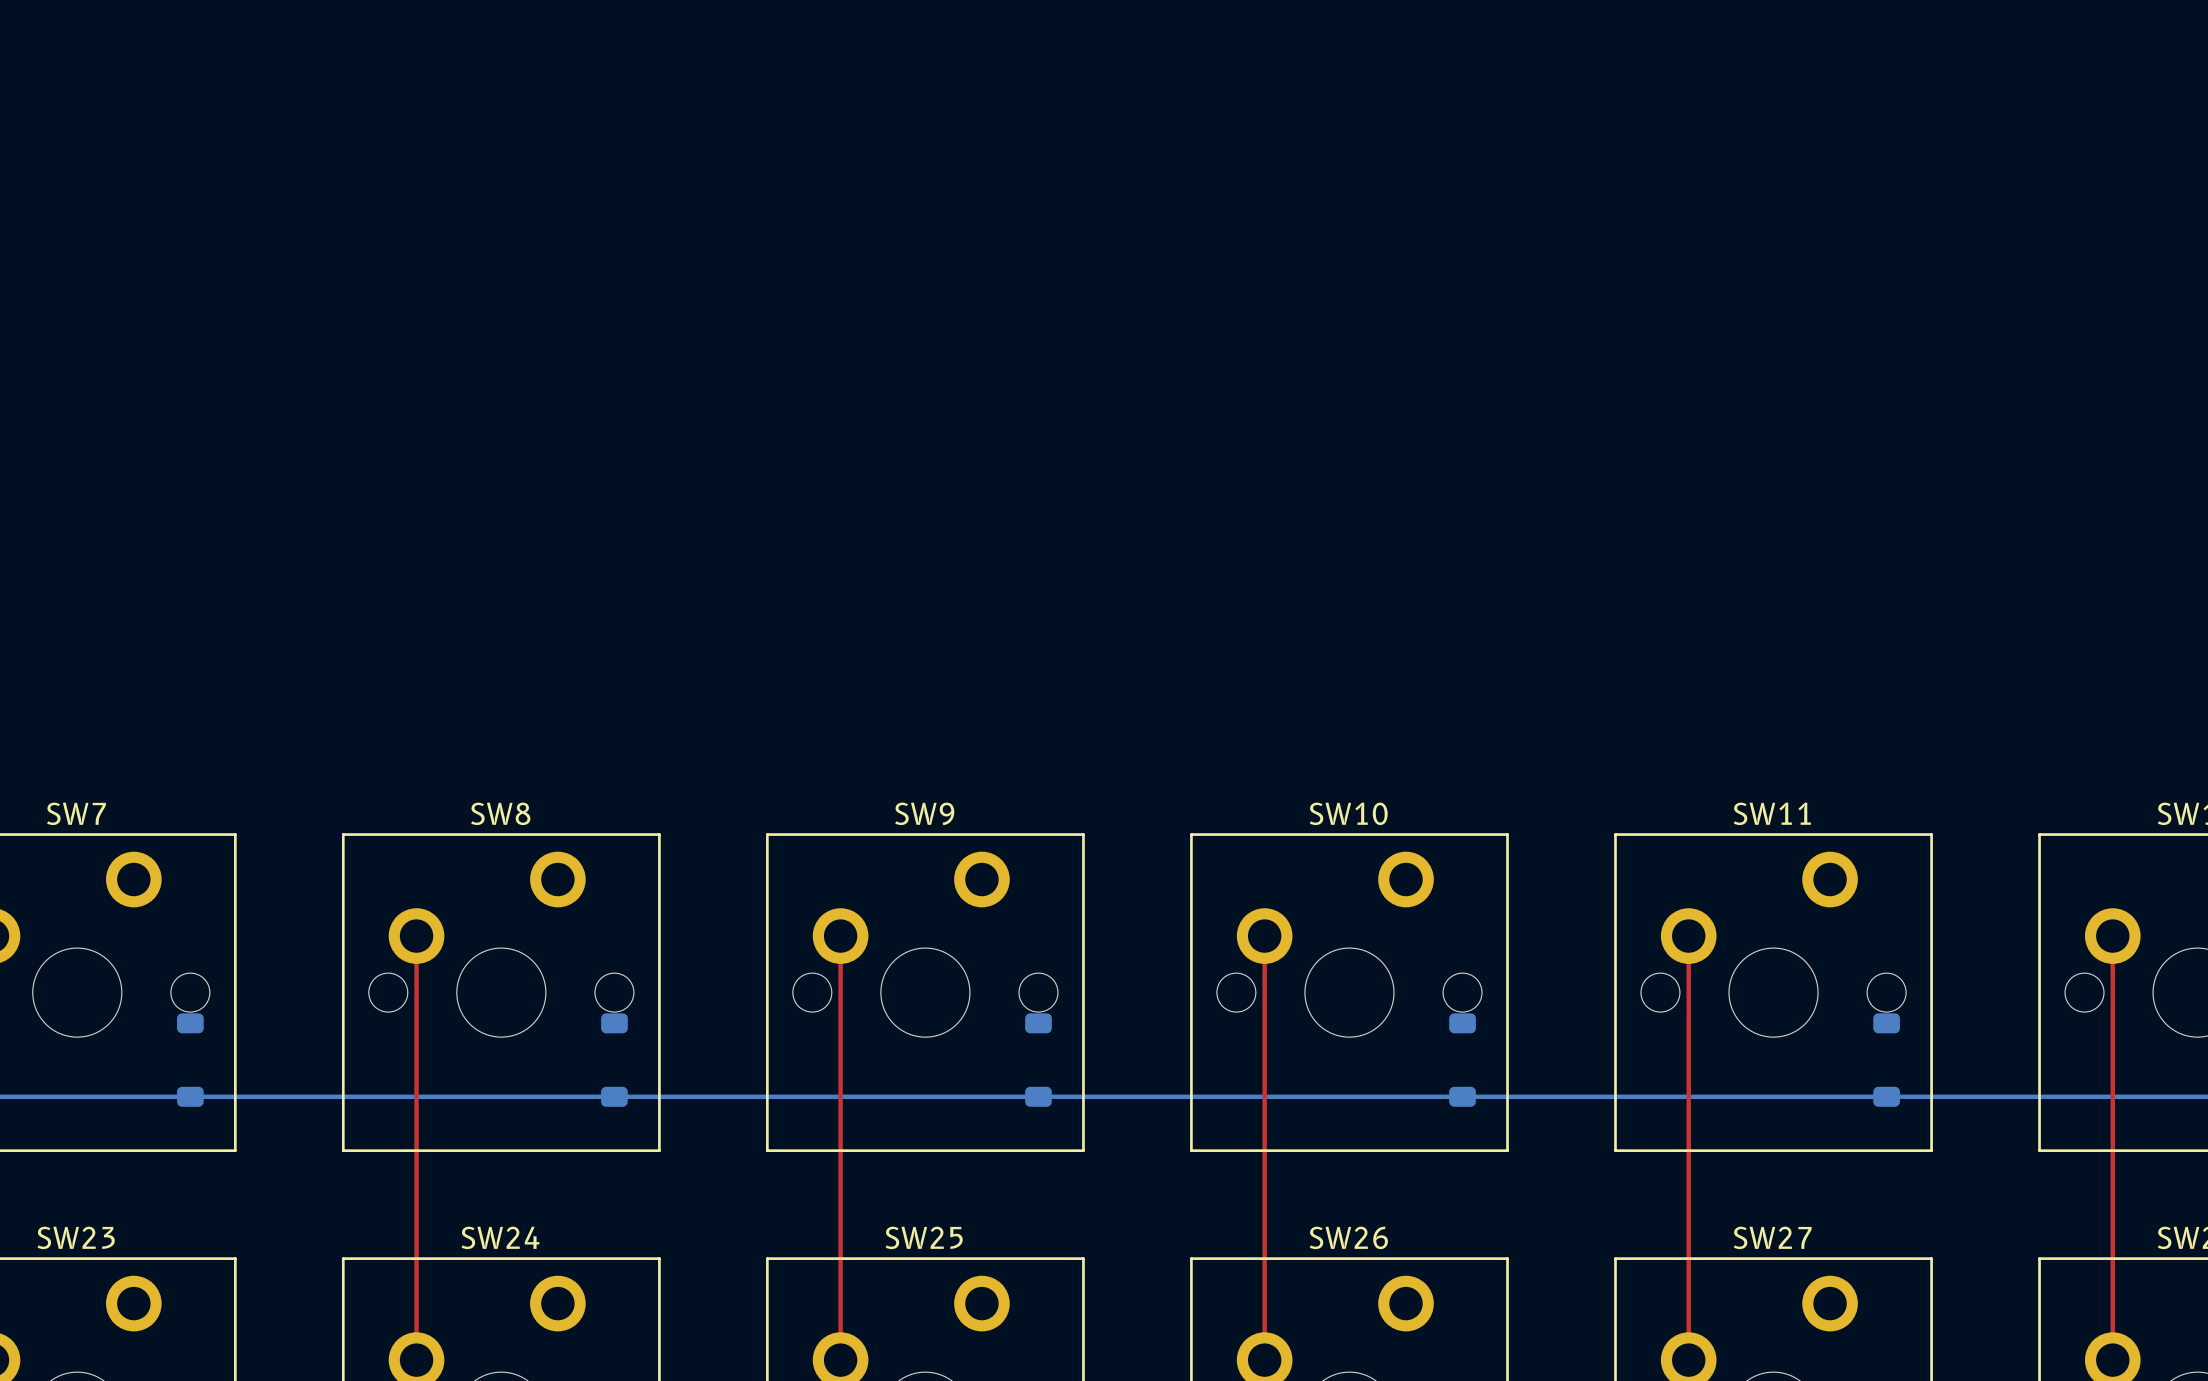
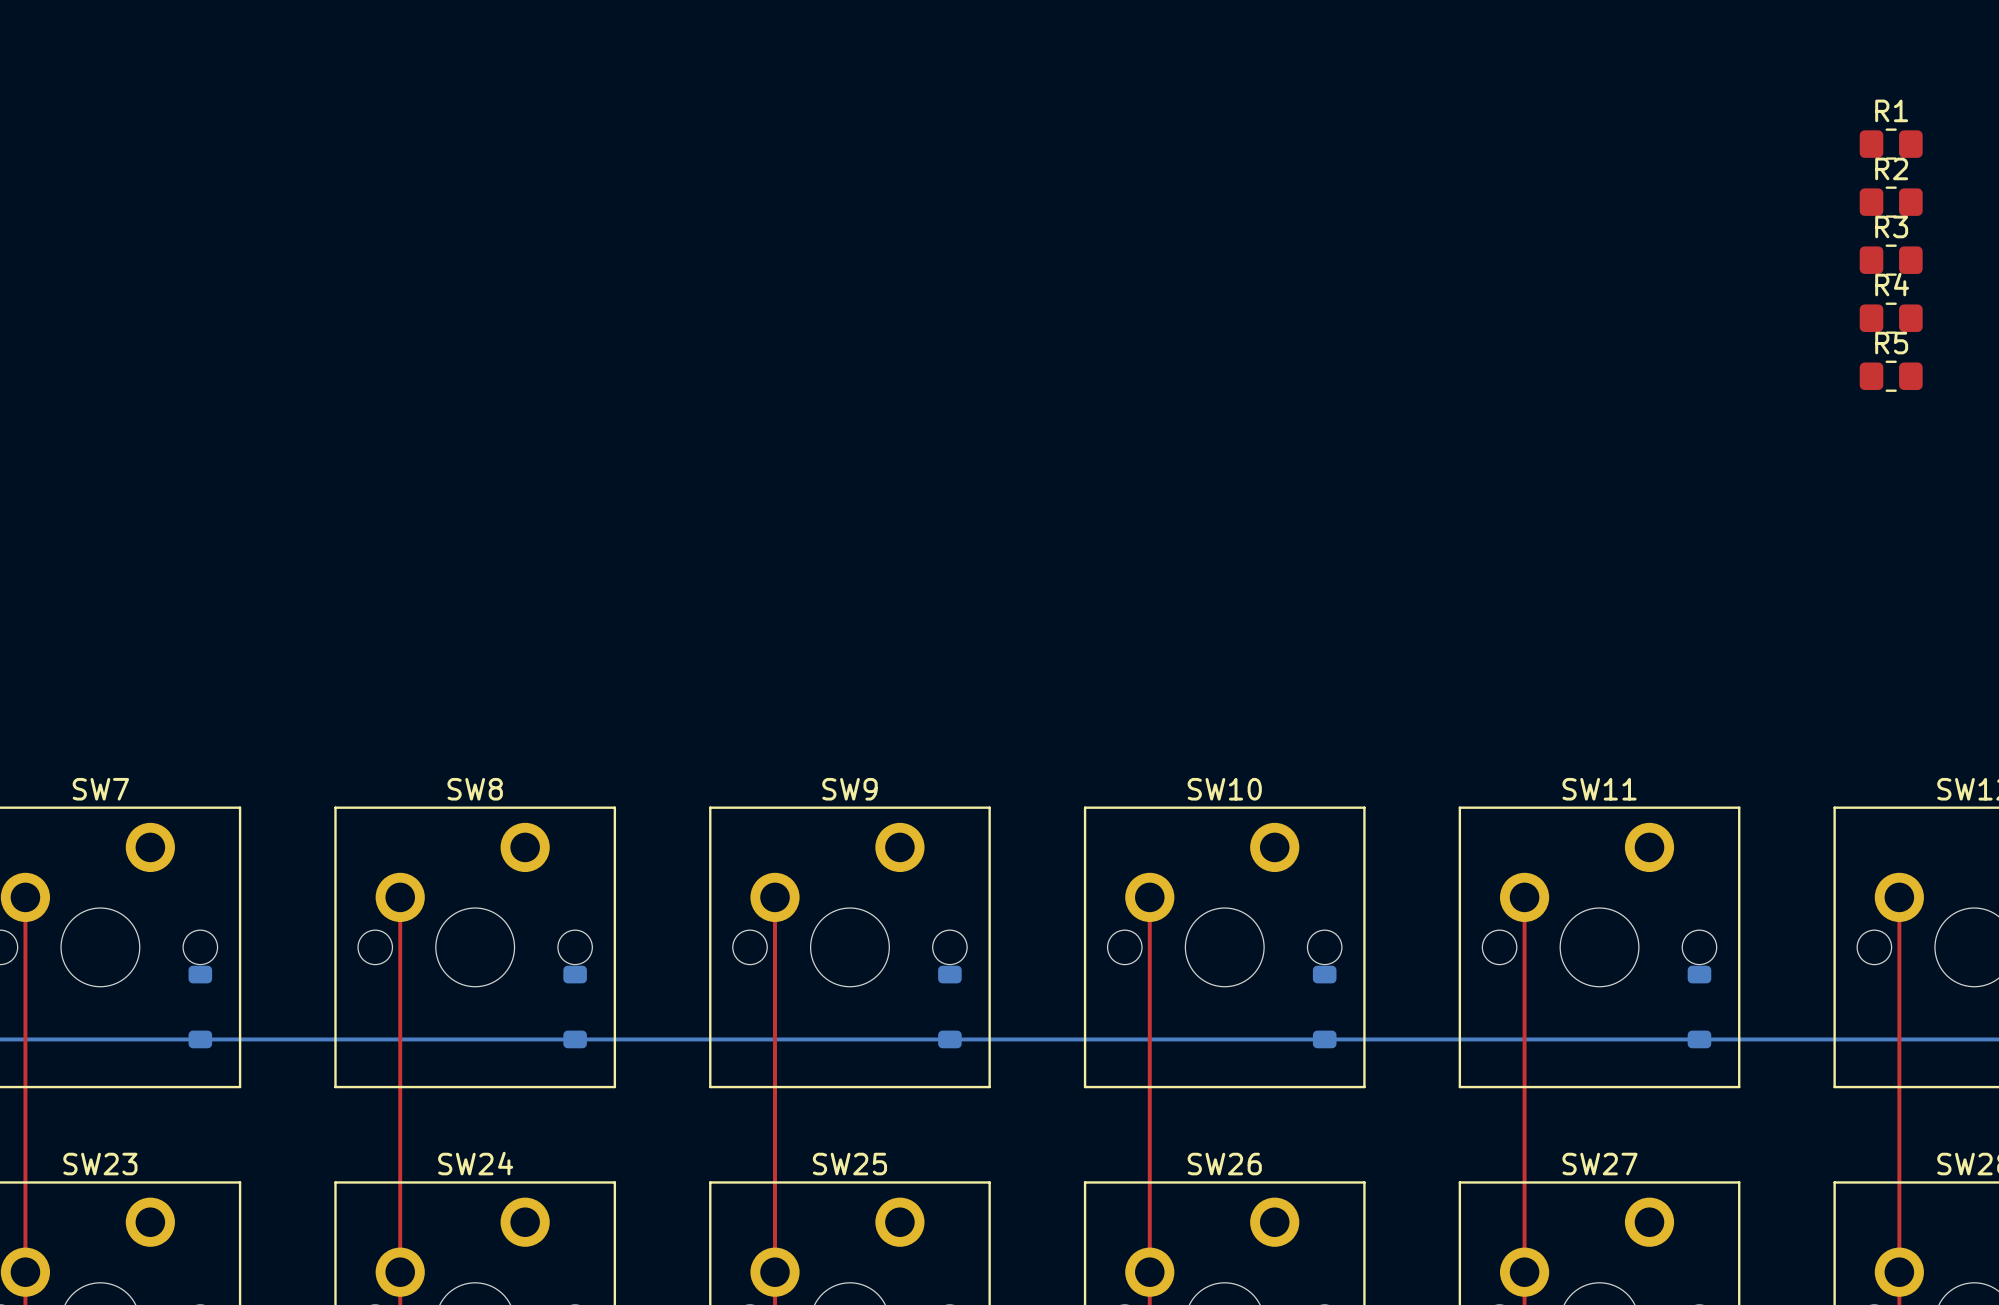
R1: none -> (1891, 144)
R2: none -> (1891, 202)
R3: none -> (1891, 260)
R4: none -> (1891, 318)
R5: none -> (1891, 376)

